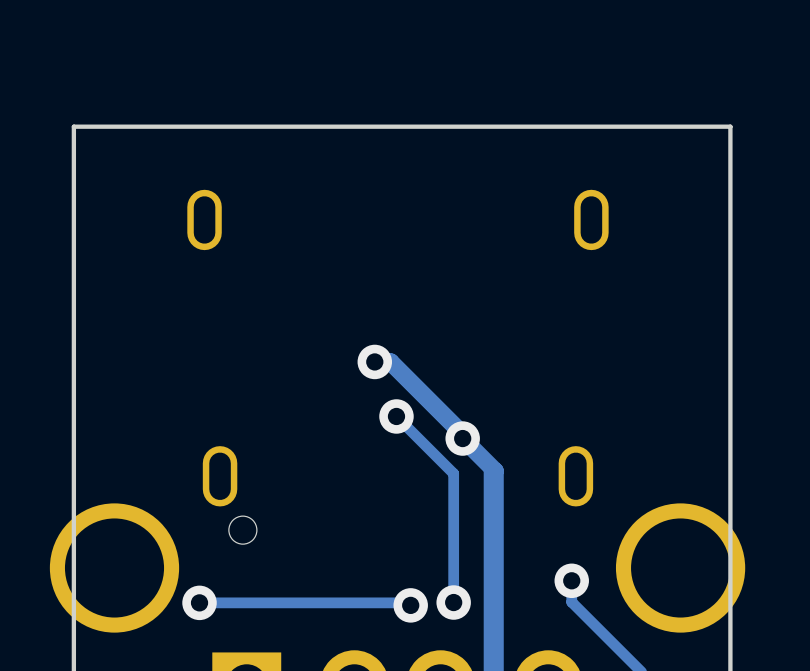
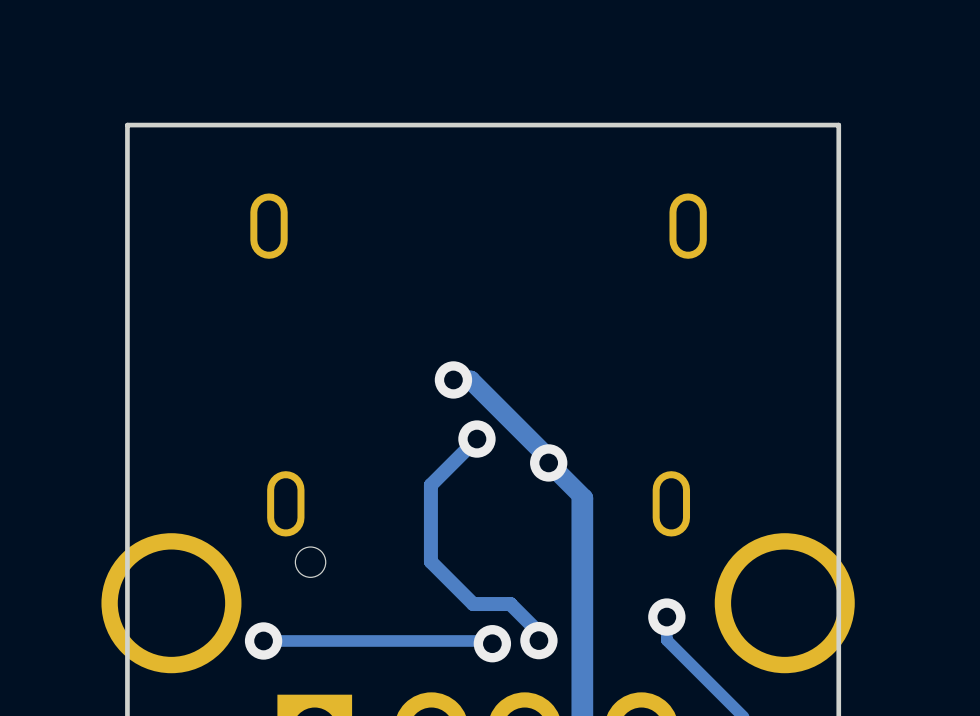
track: (396, 416) (453, 473) (453, 595) -> (476, 439) (430, 485) (430, 561) (473, 604) (510, 604) (538, 632)

